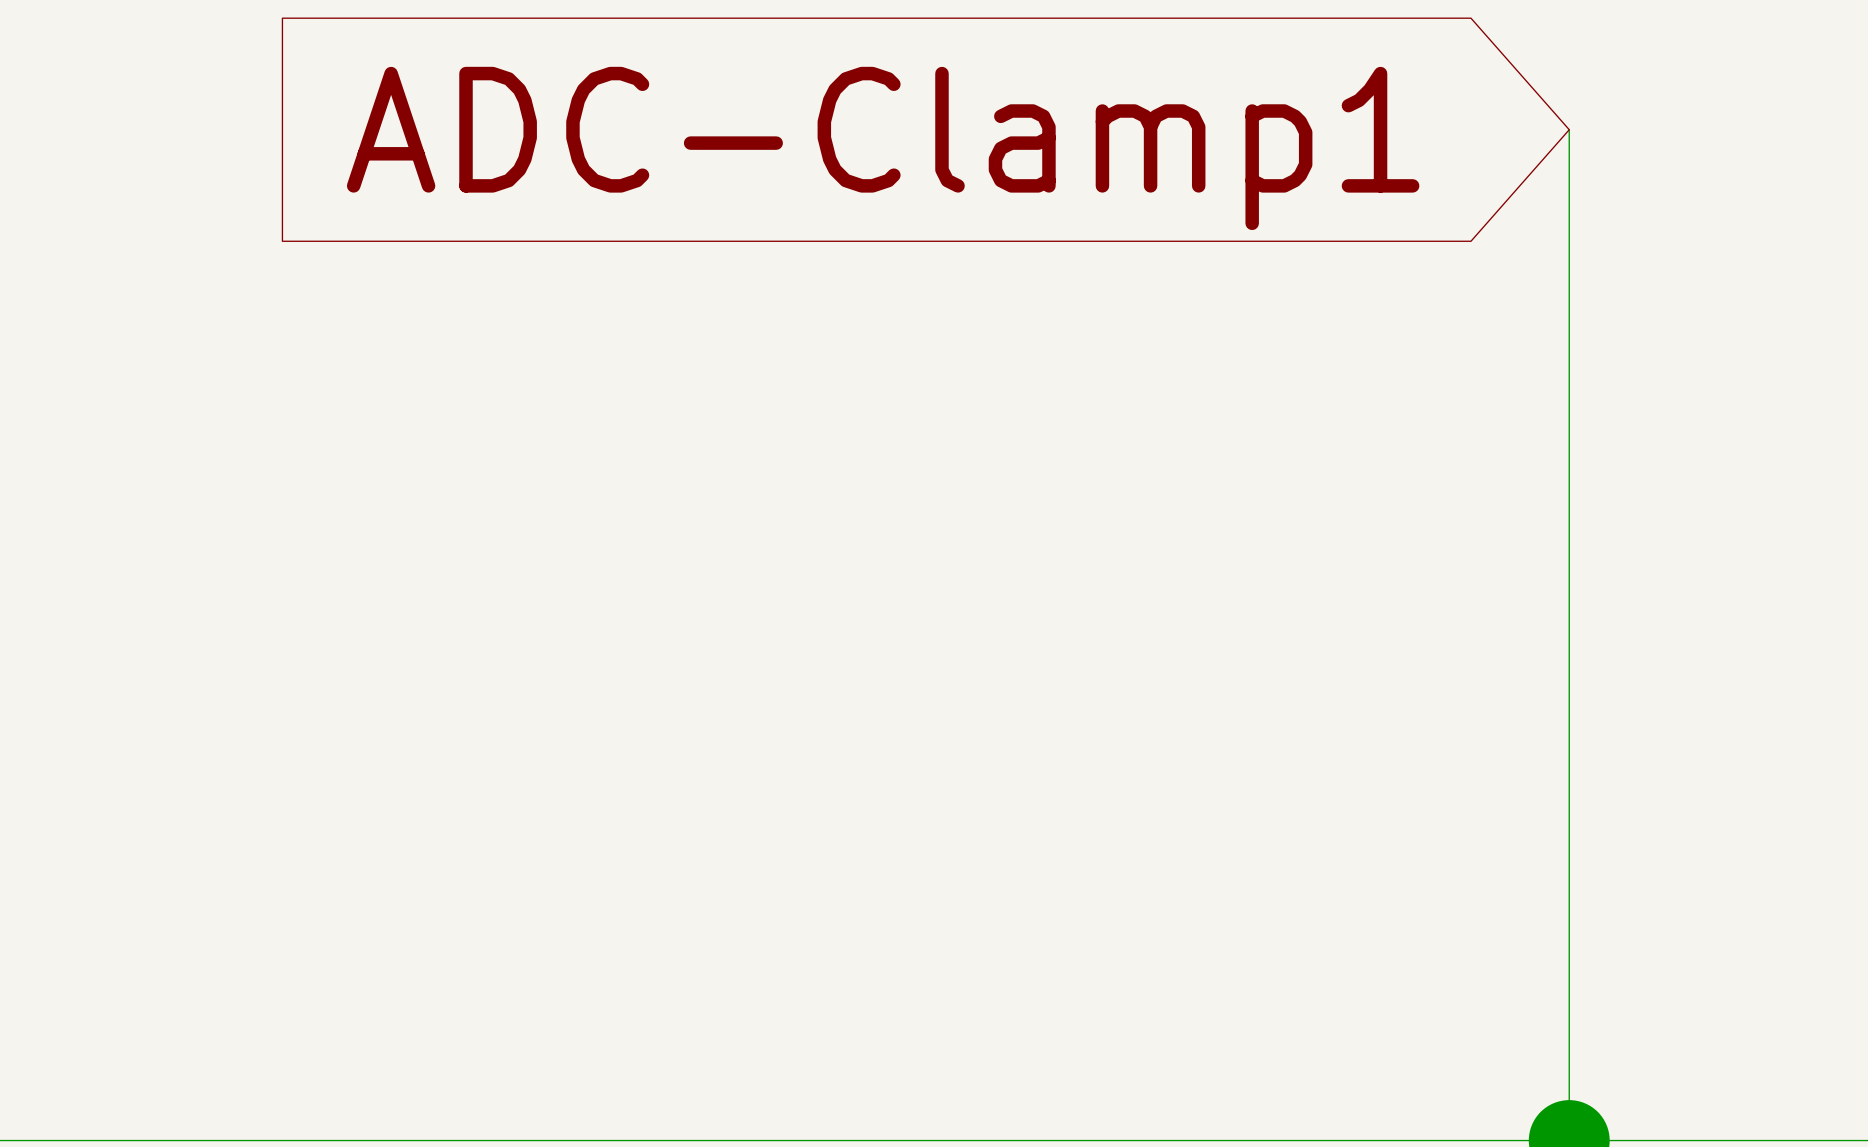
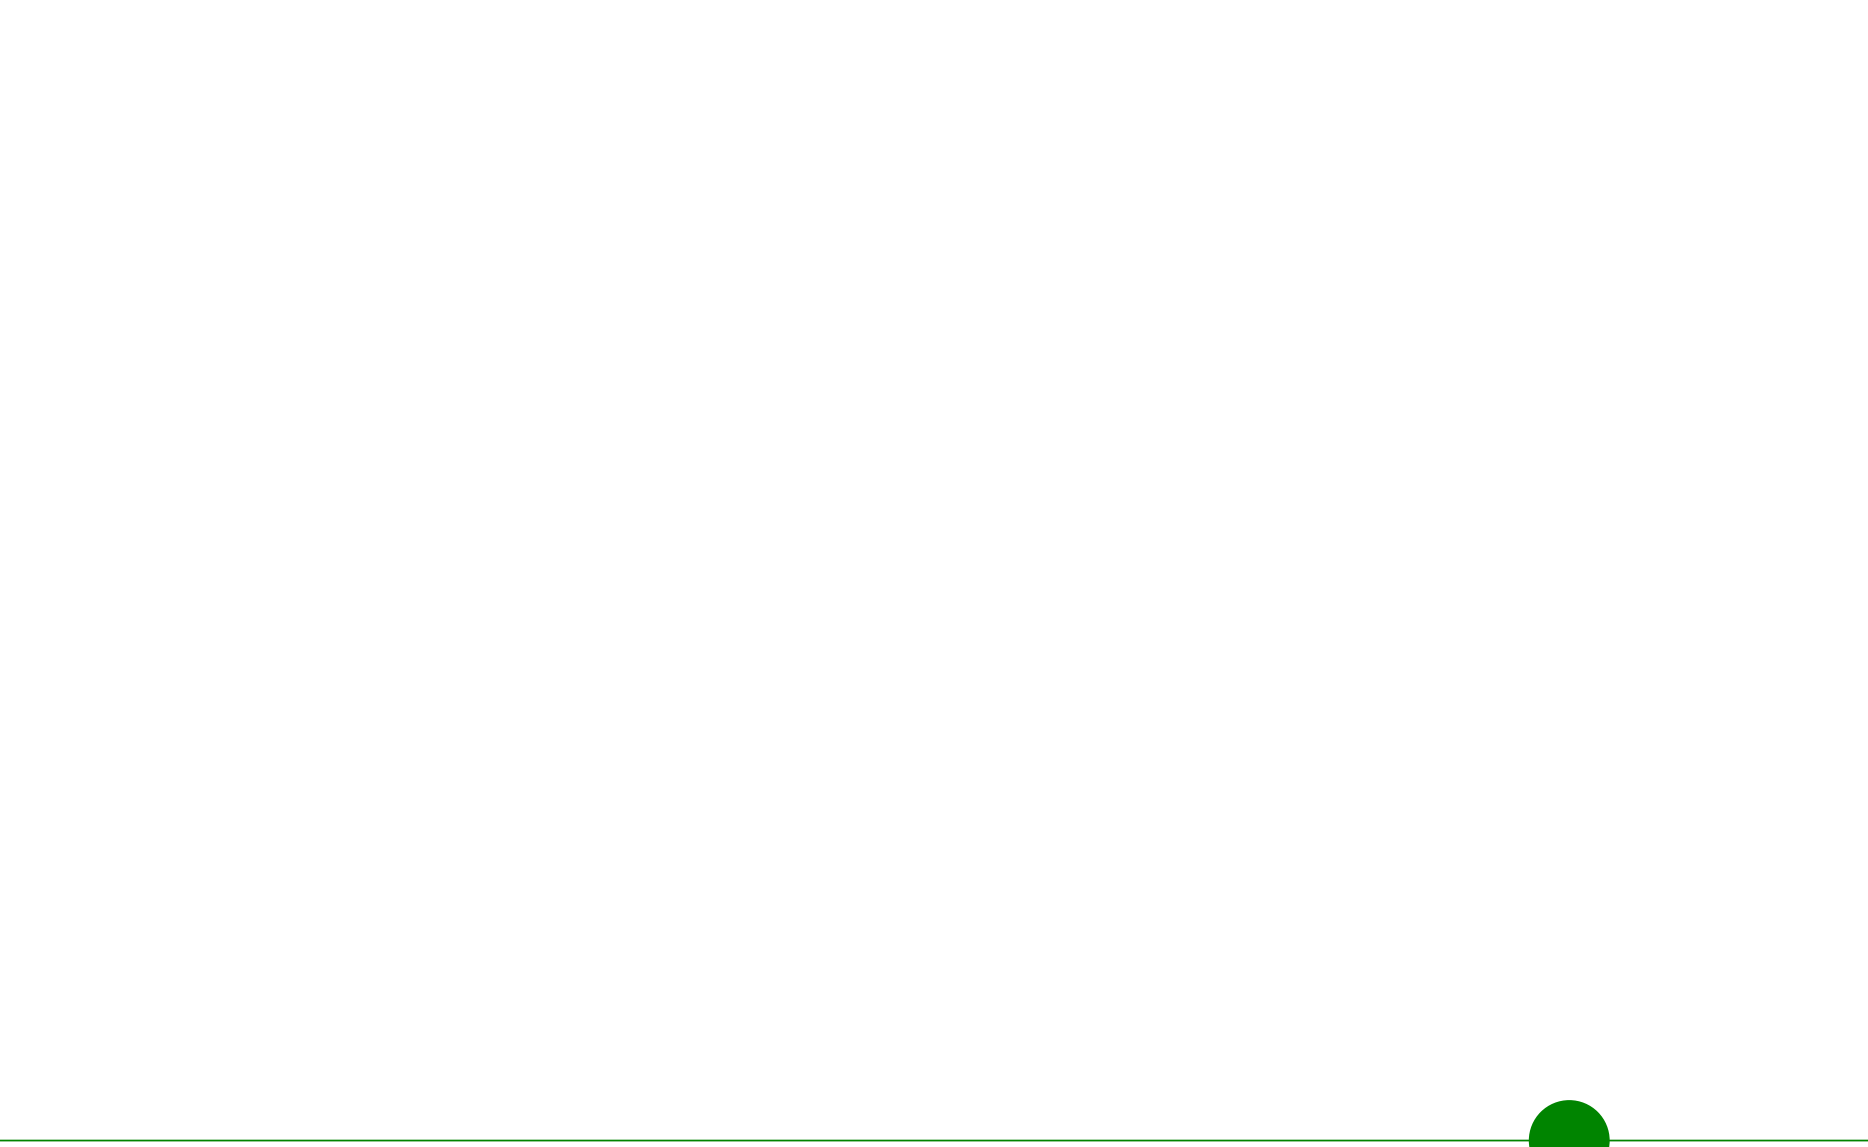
wire: (1569, 129) (1569, 1140) -> none
global label: ADC-Clamp1 (883, 148) -> none

